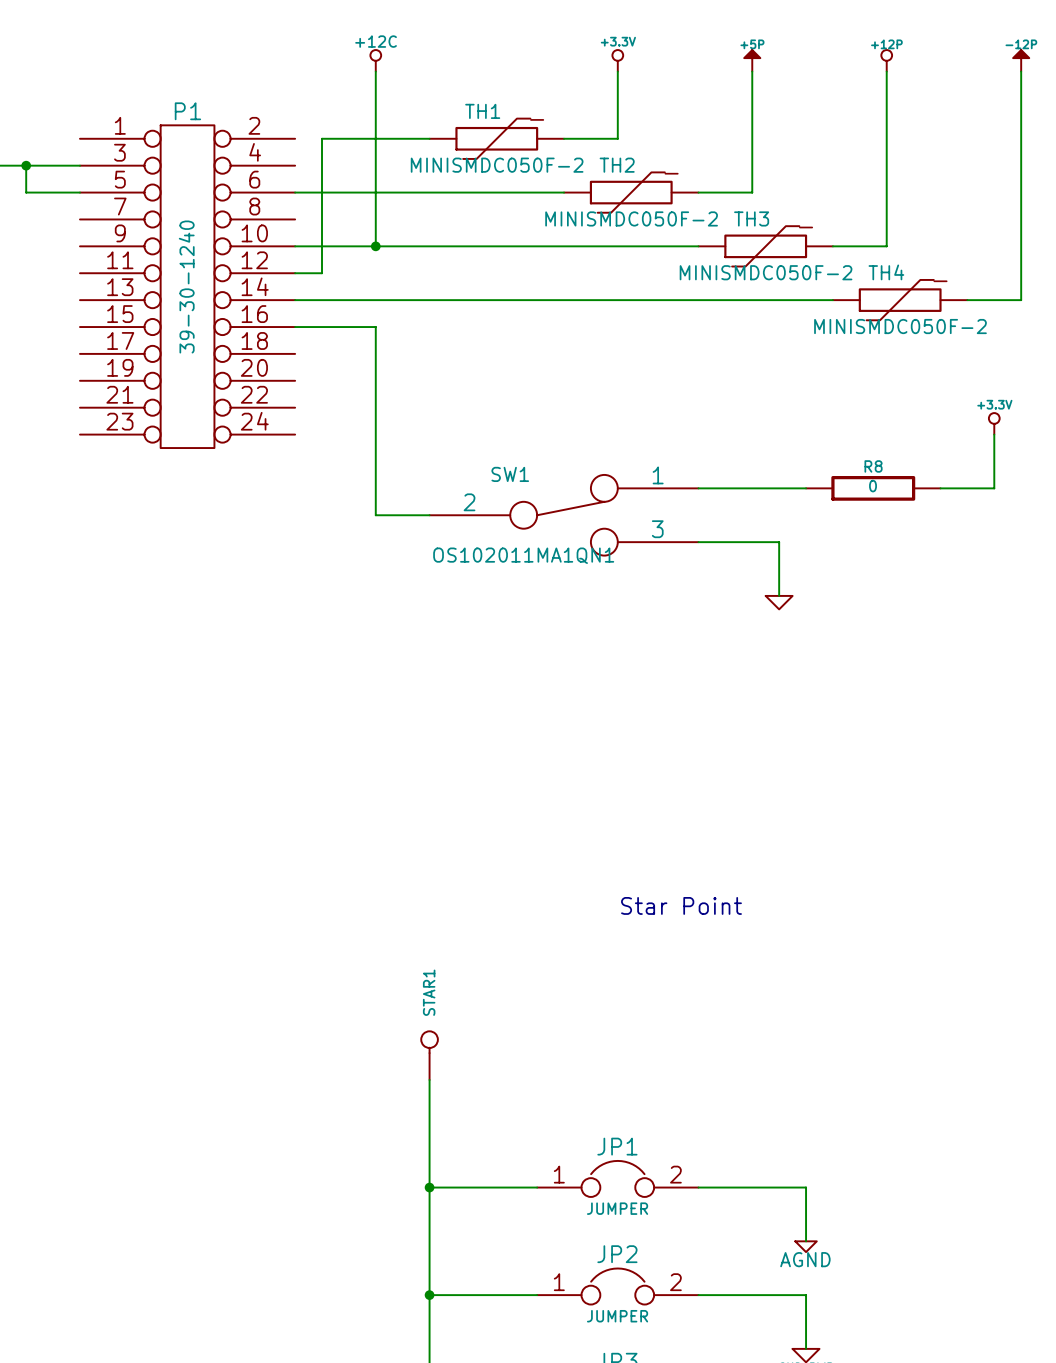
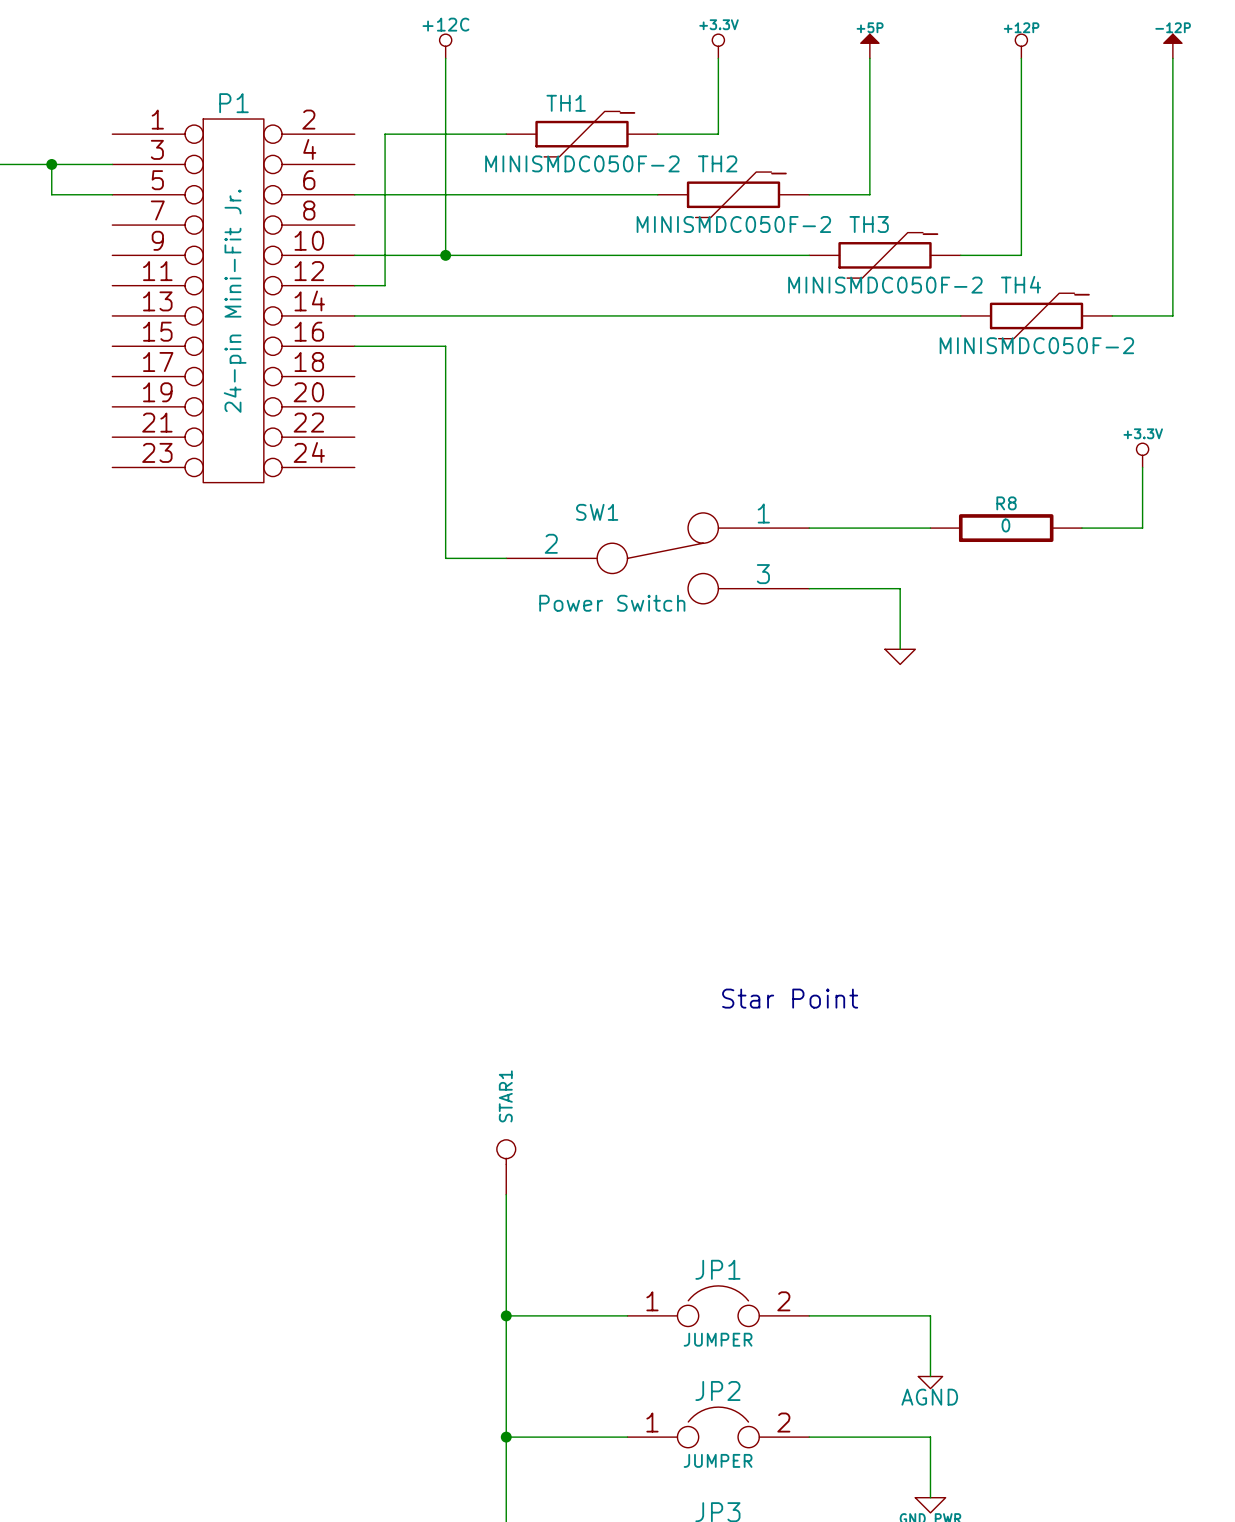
P1 value: 39-30-1240 (186, 287) -> 24-pin Mini-Fit Jr. (235, 301)
SW1 value: OS102011MA1QN1 (523, 555) -> Power Switch (612, 603)

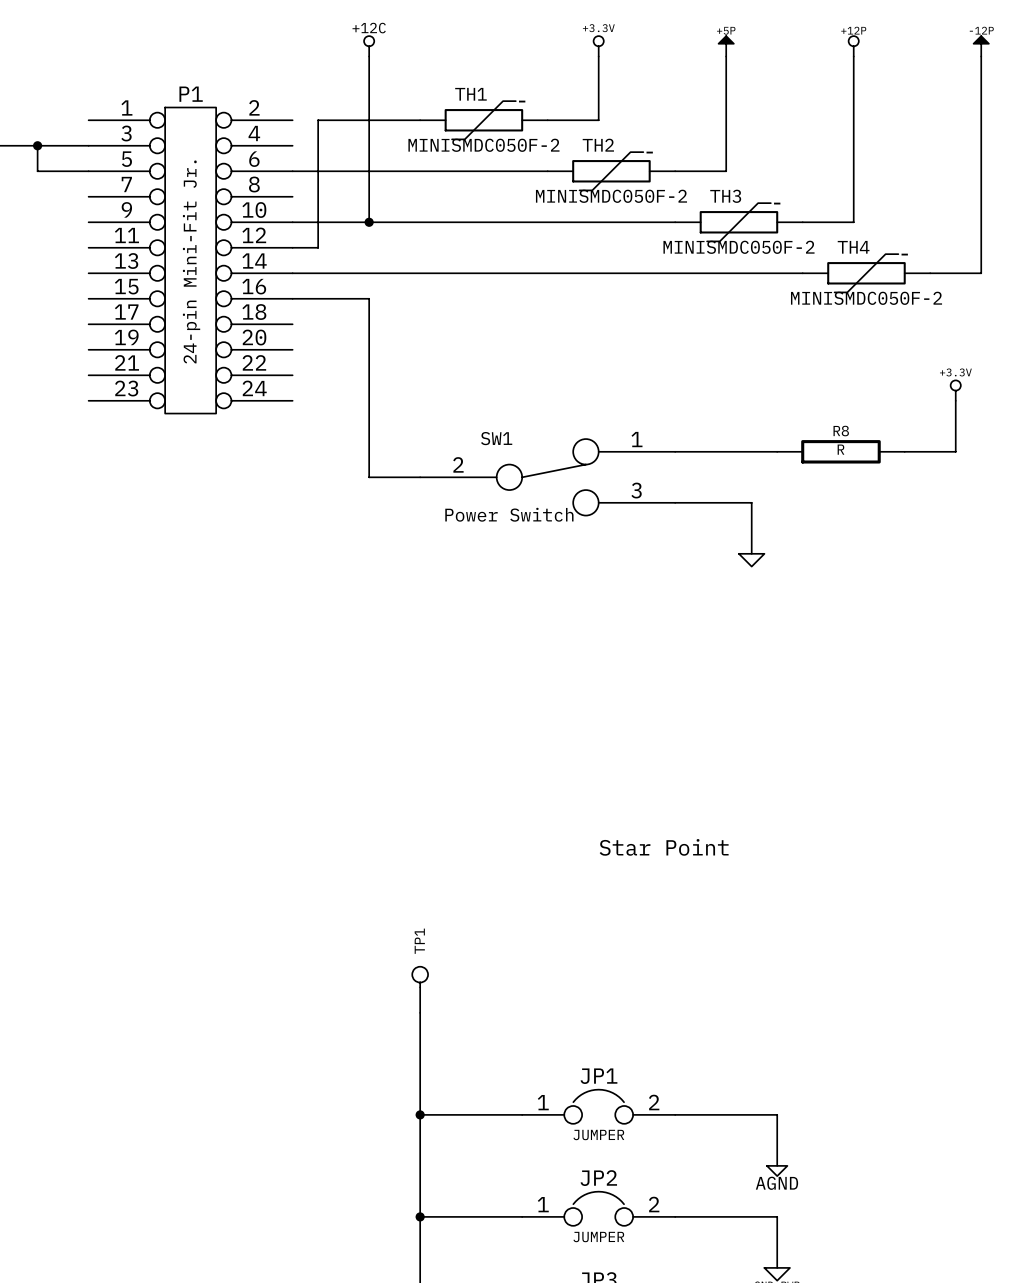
R8 value: 0 (1005, 525) -> R (841, 449)
STAR1 name: STAR1 (505, 1096) -> TP1 (419, 941)

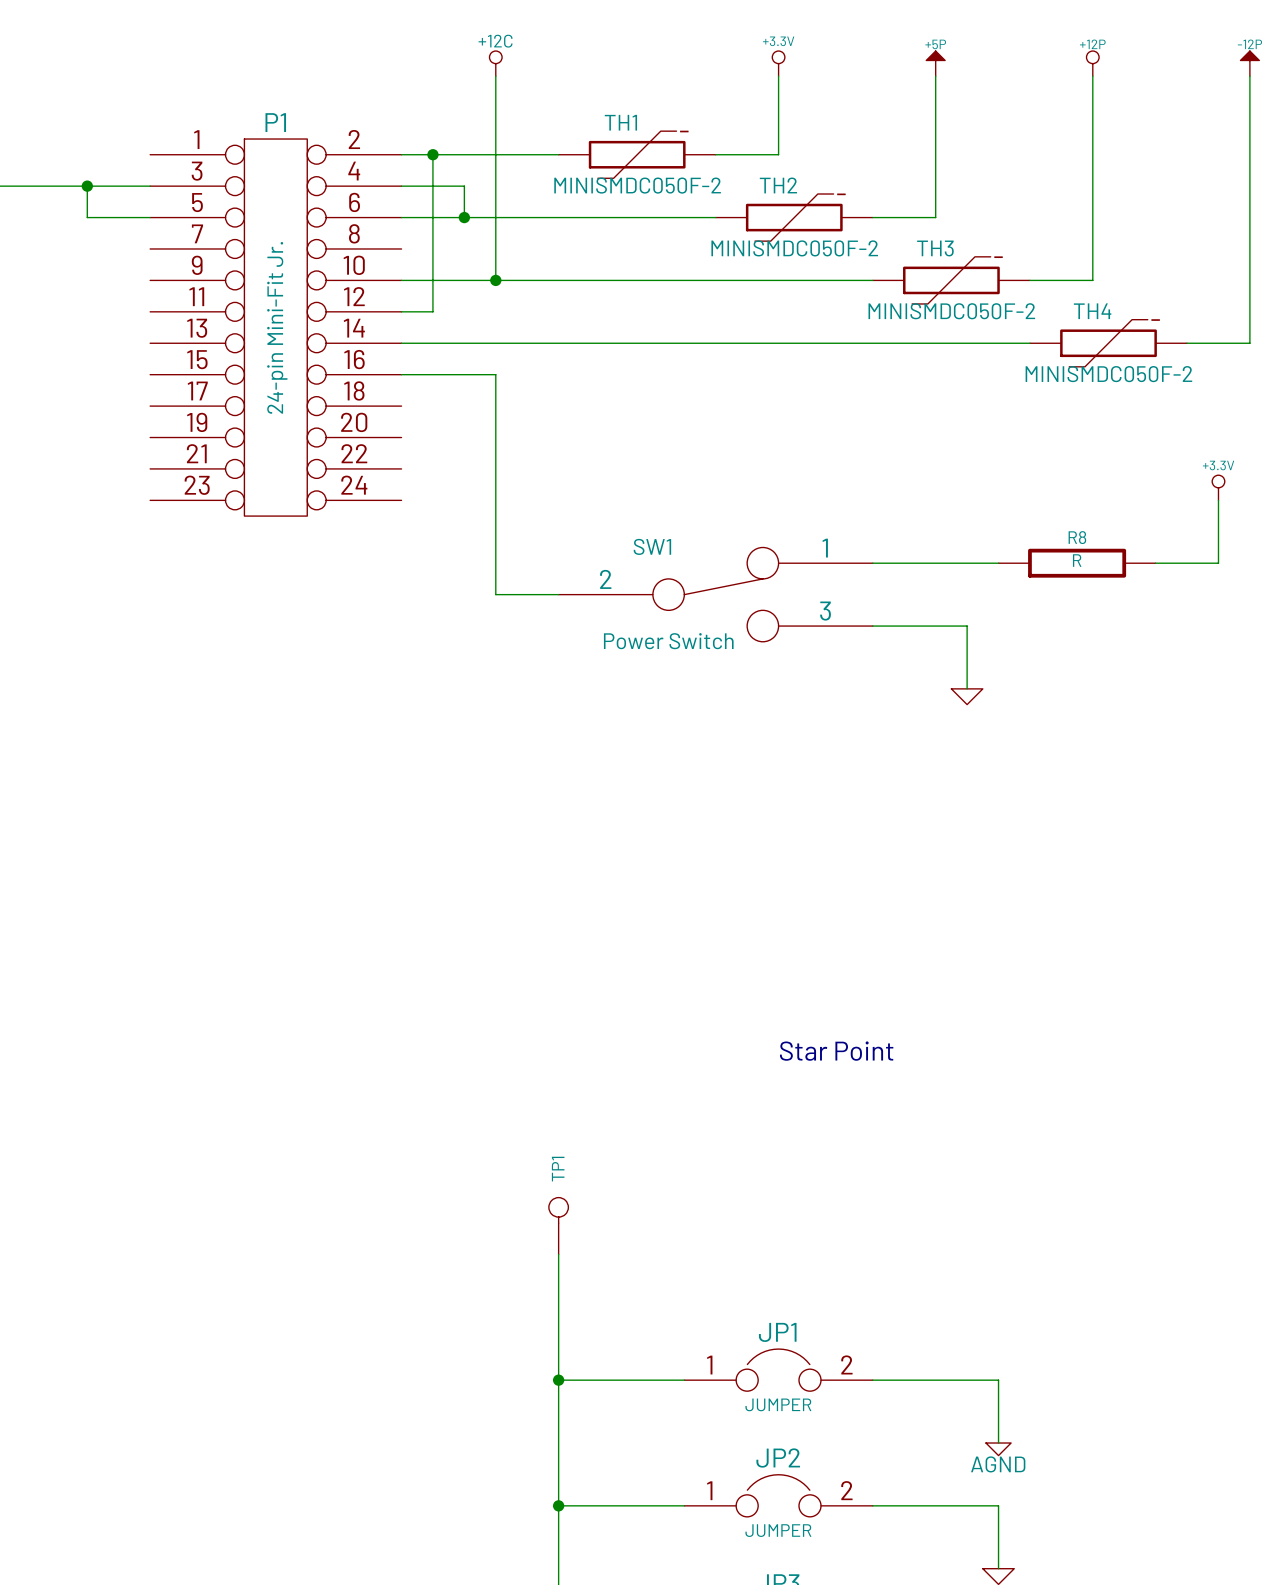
wire: none -> (401, 154) (432, 154)
junction: none -> (432, 154)
wire: none -> (401, 186) (464, 186) (464, 217)
junction: none -> (464, 217)

